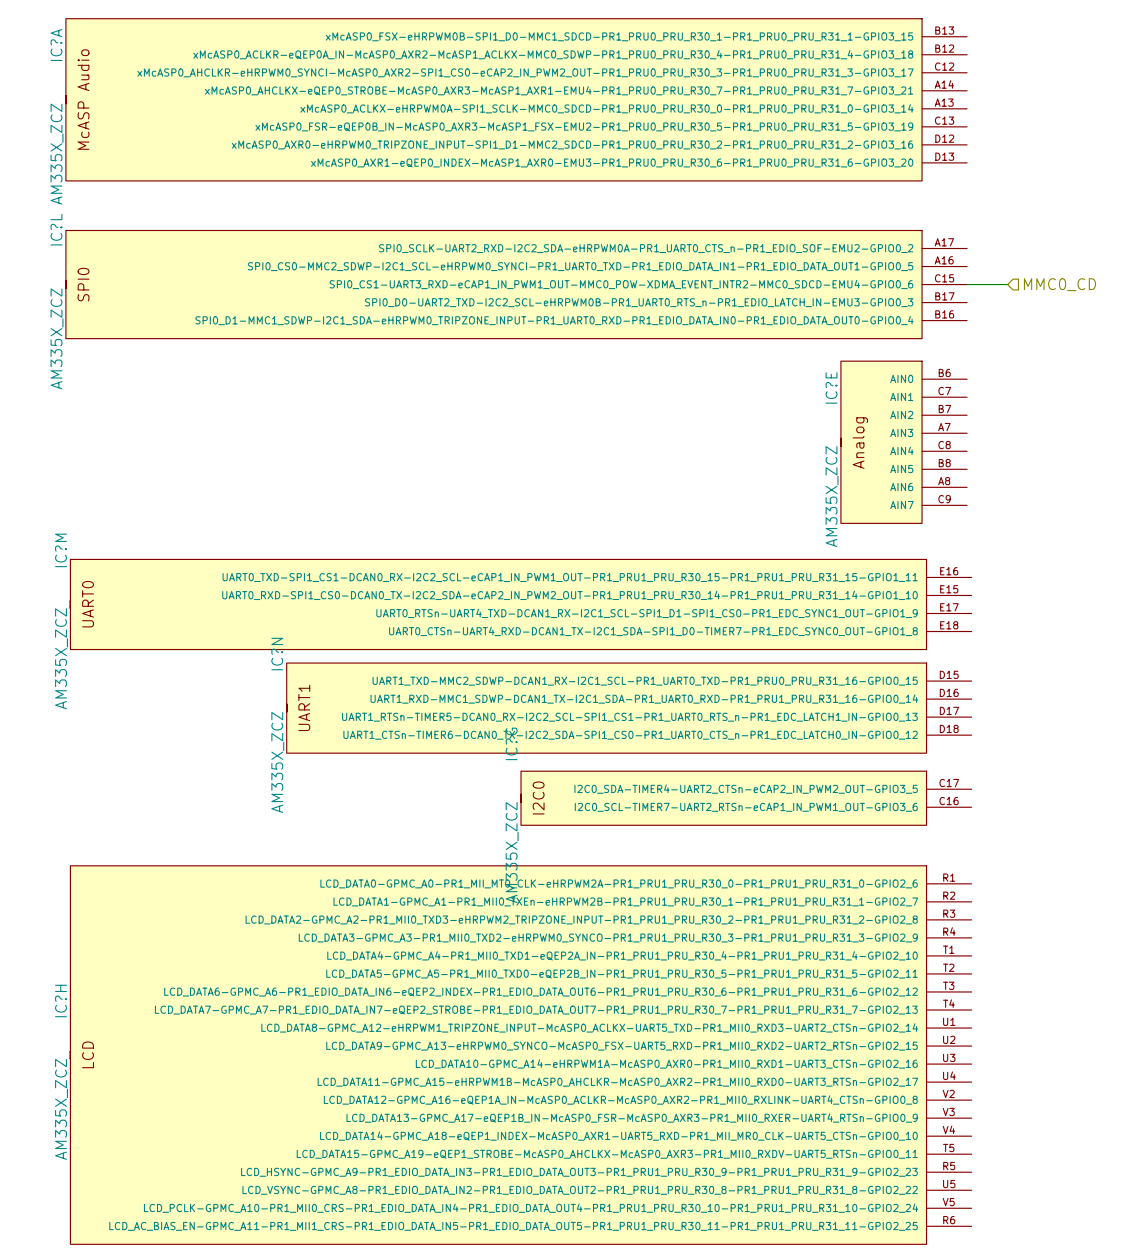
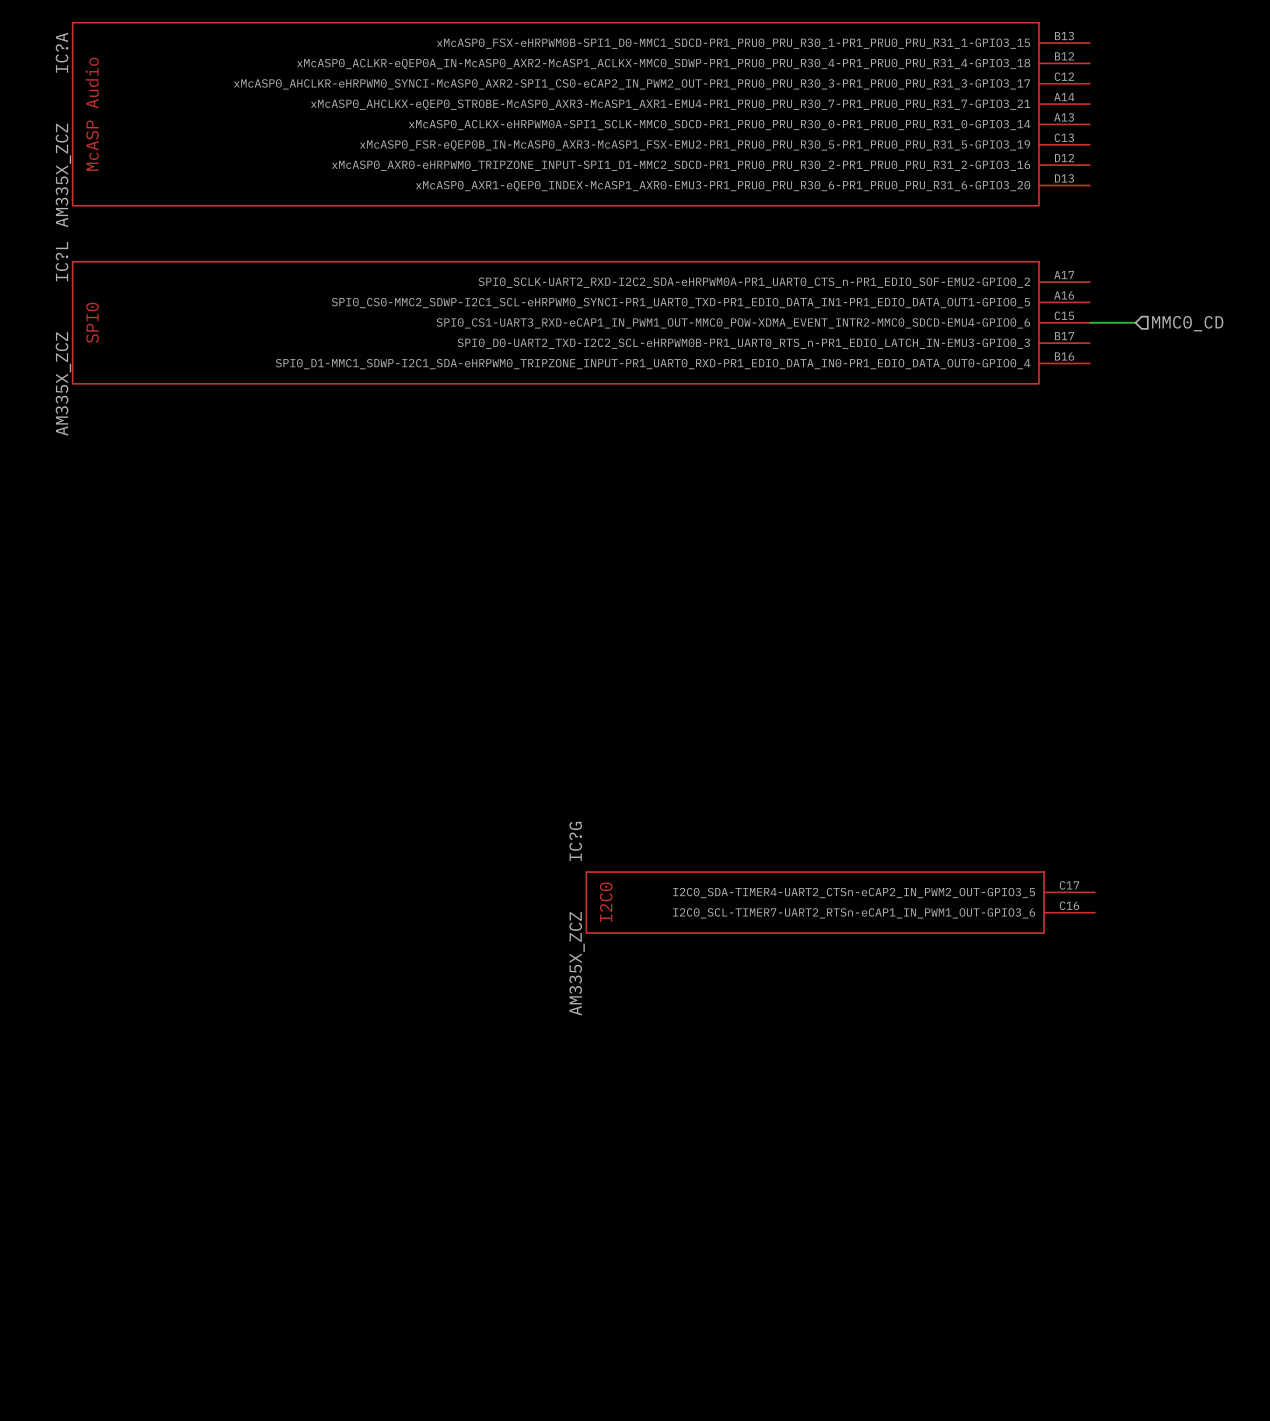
IC?E: AM335X_ZCZ (903, 442) -> none
IC?M: AM335X_ZCZ (520, 604) -> none
IC?N: AM335X_ZCZ (629, 708) -> none
IC?H: AM335X_ZCZ (520, 1055) -> none

